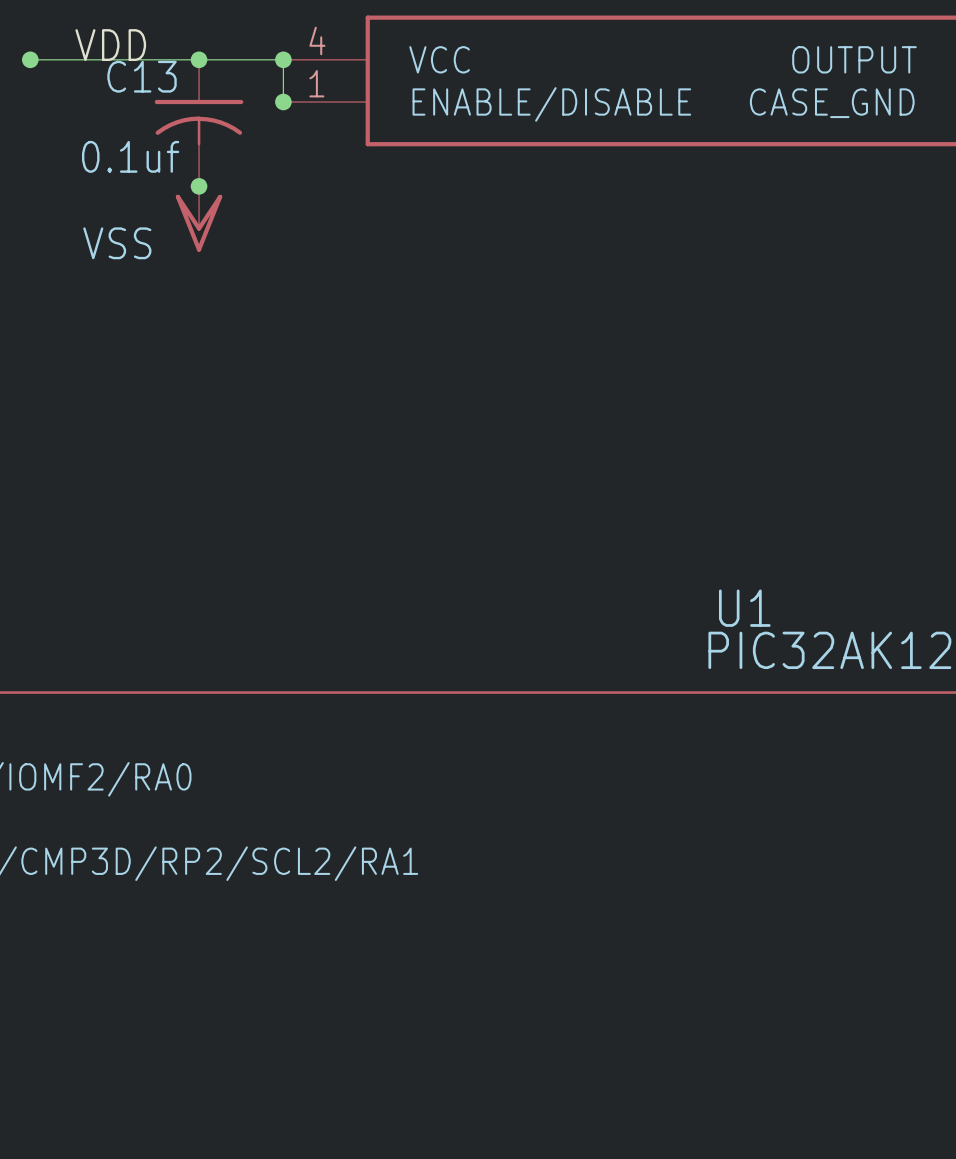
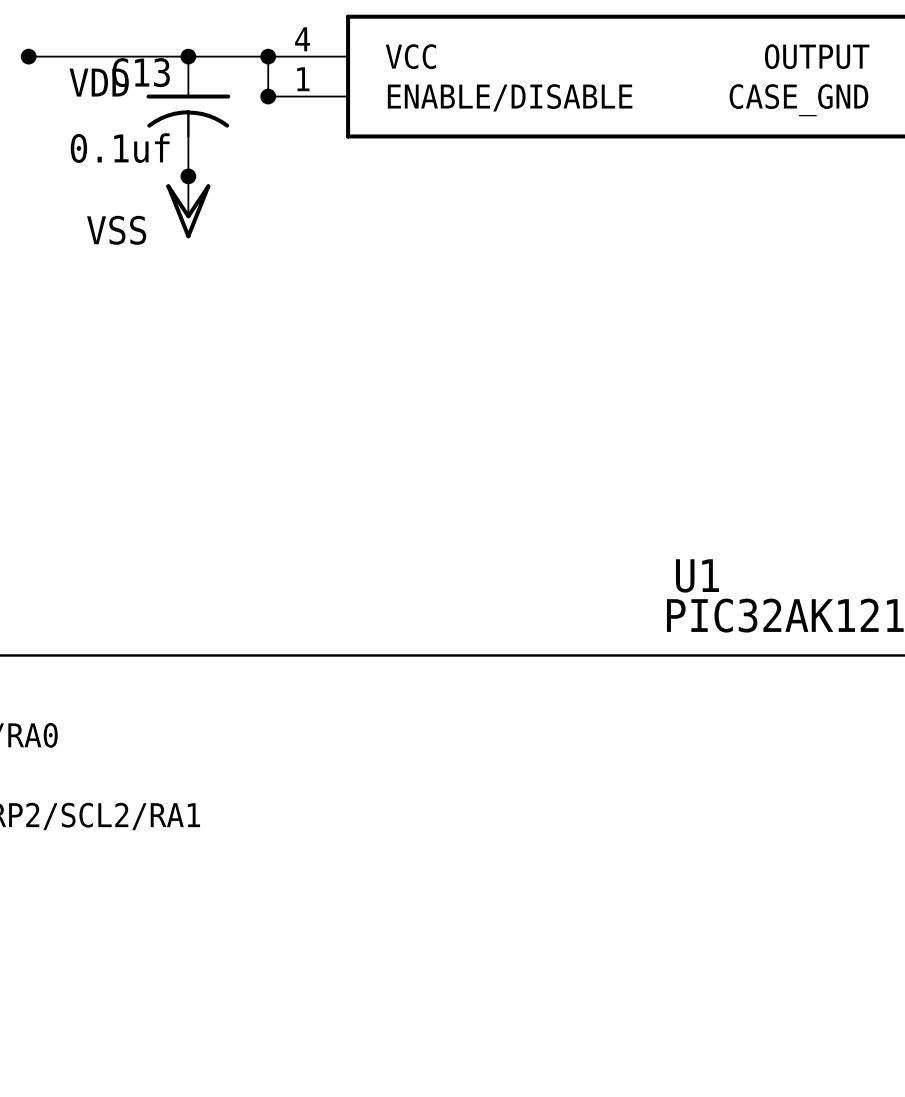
label position: VDD (110, 45) -> VDD (99, 82)

